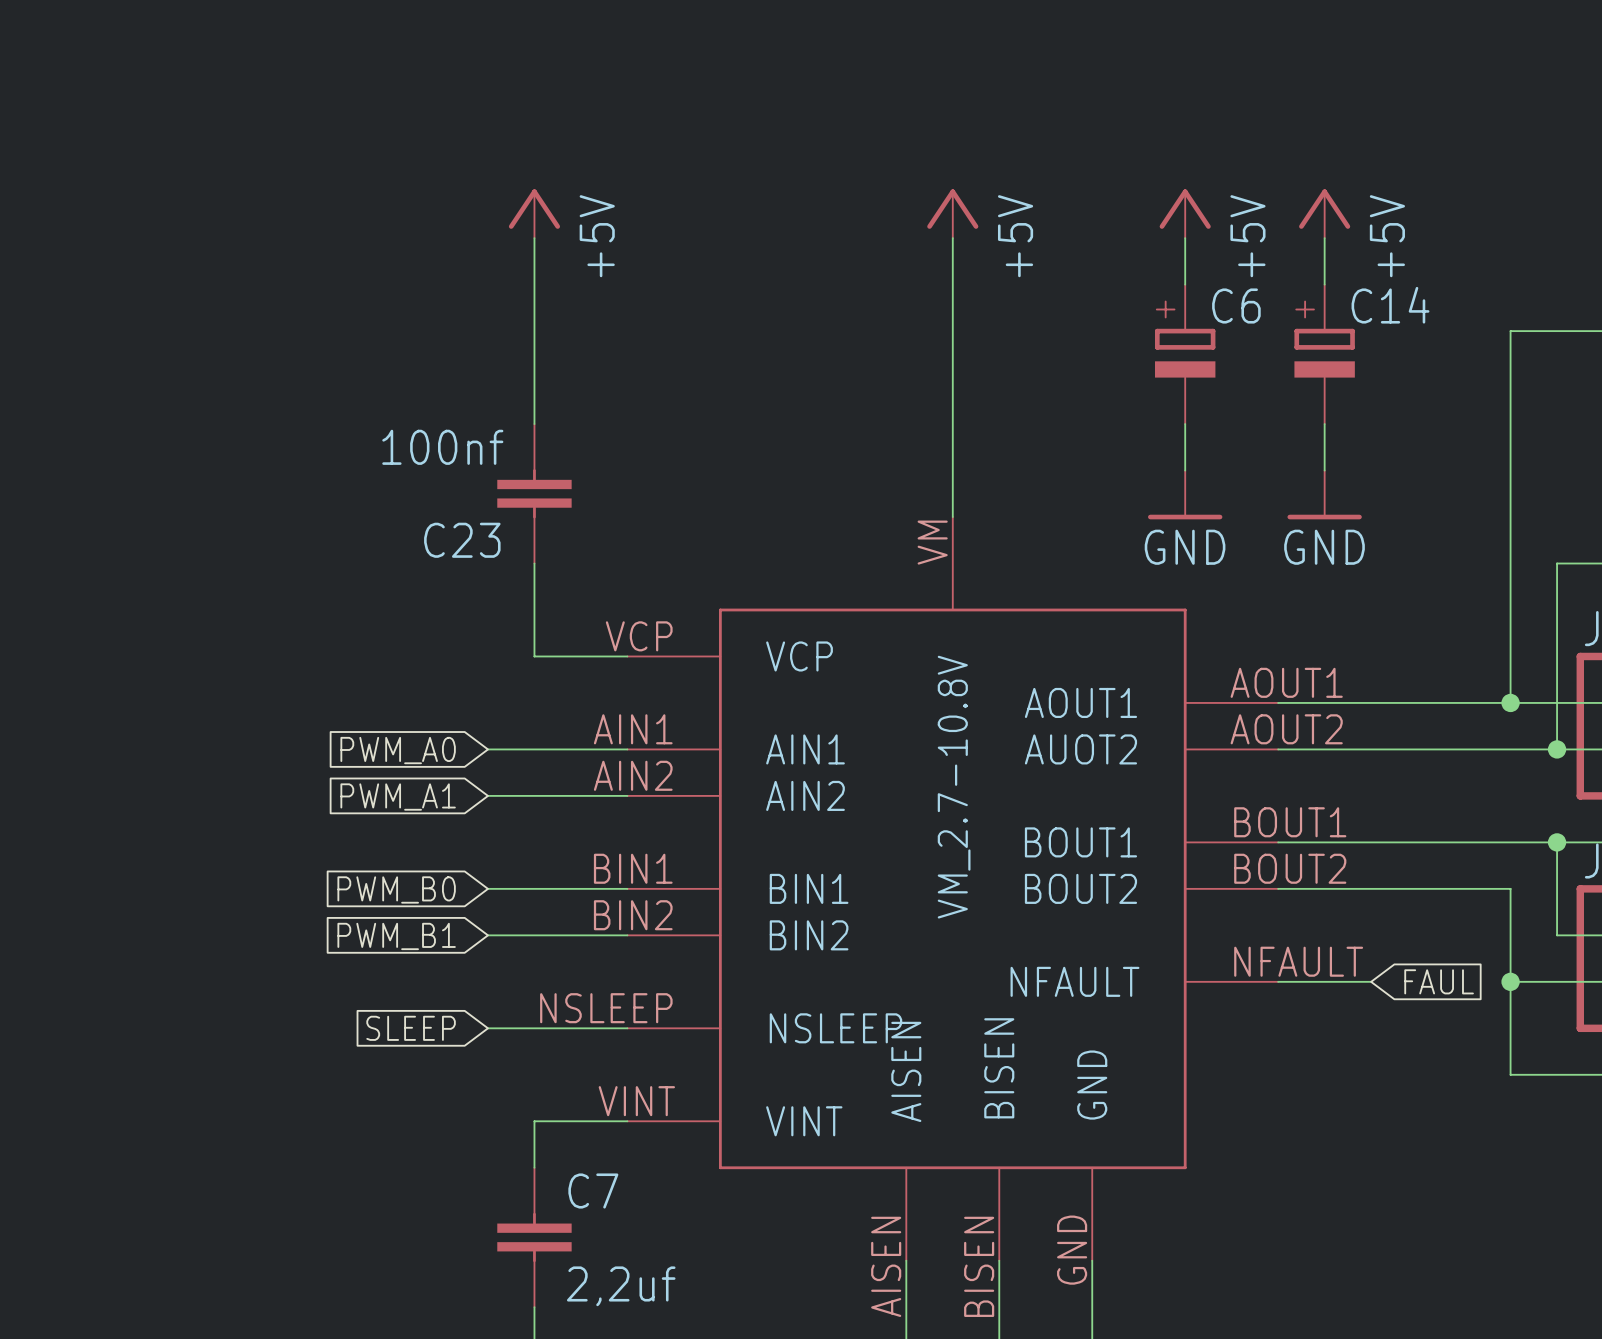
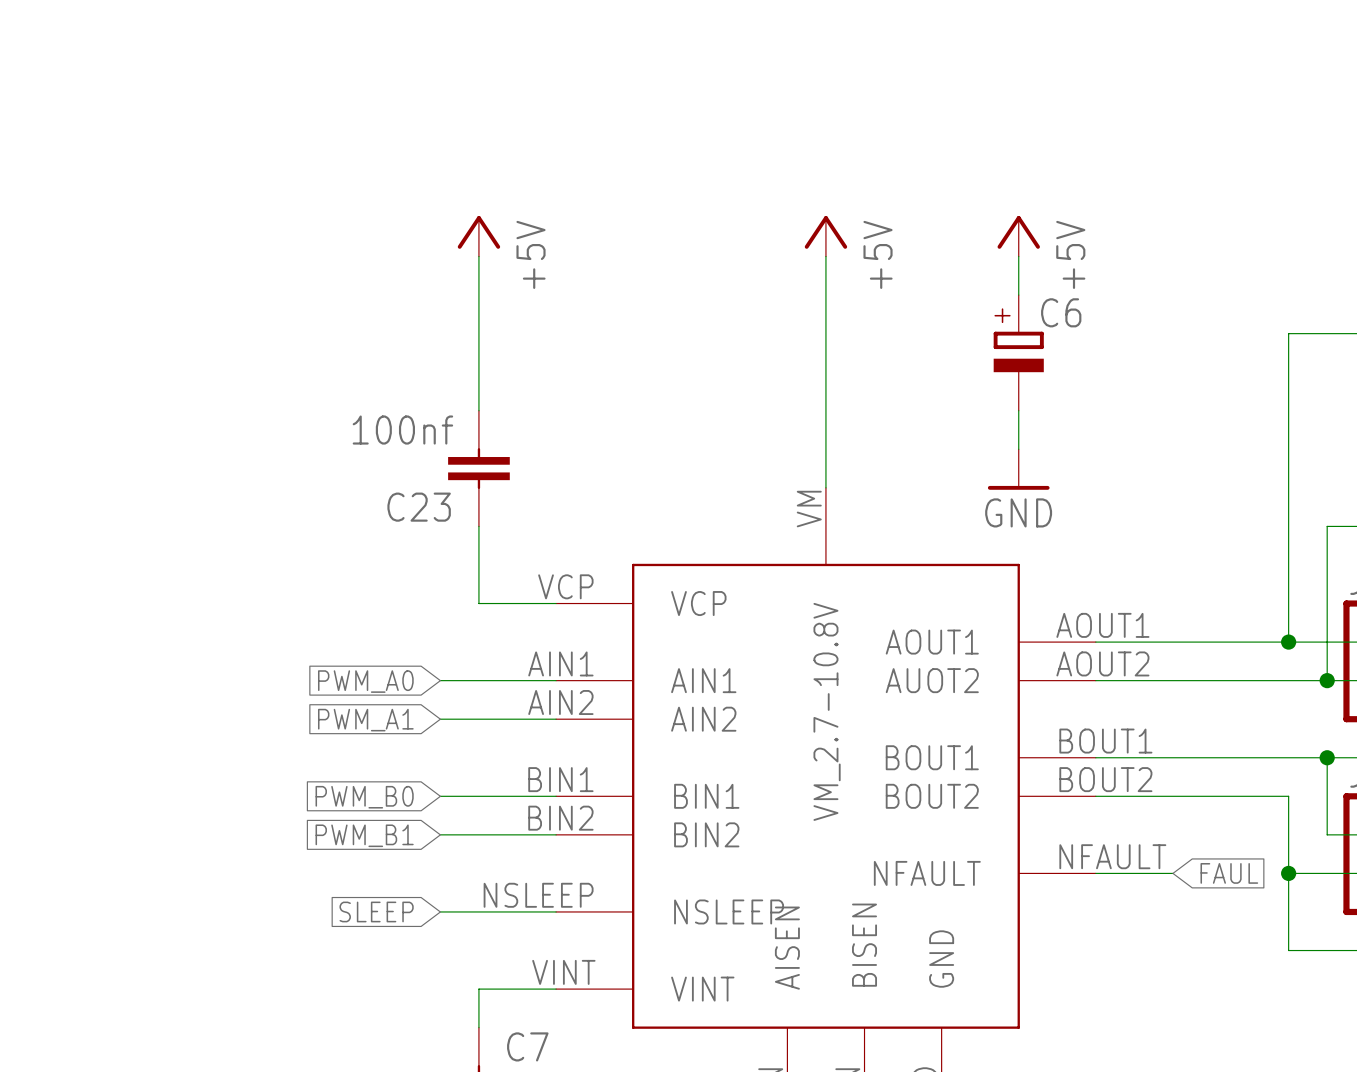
power symbol: +5V (1324, 213) -> none
wire: (1324, 238) (1324, 284) -> none
C14: (1324, 354) -> none
wire: (1324, 424) (1324, 470) -> none
power symbol: GND (1324, 494) -> none

